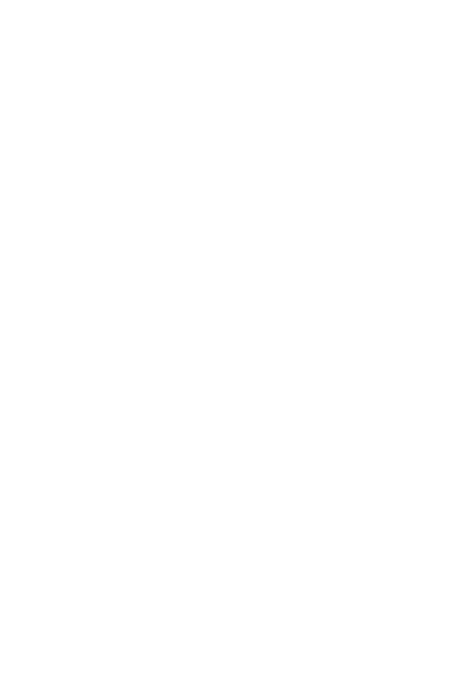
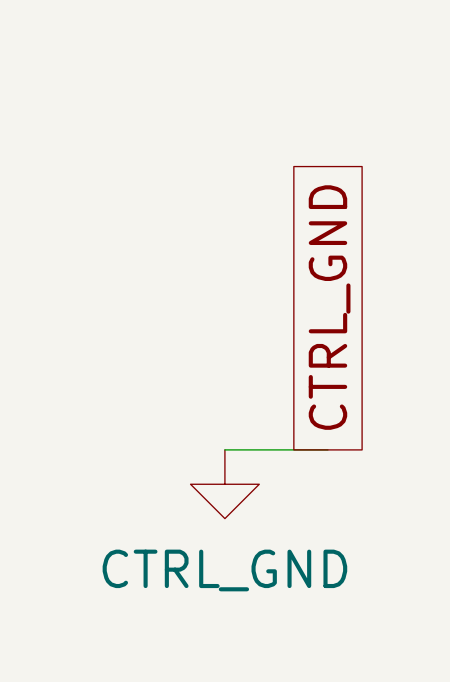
global label: none -> CTRL_GND (329, 307)
wire: none -> (224, 449) (327, 449)
power symbol: none -> CTRL_GND (224, 484)

